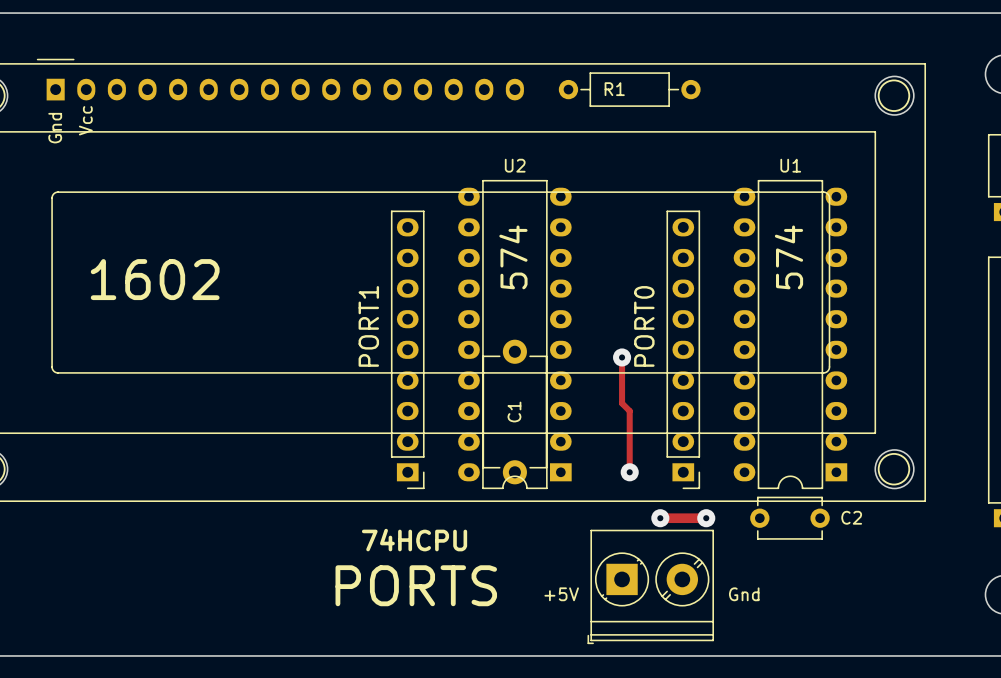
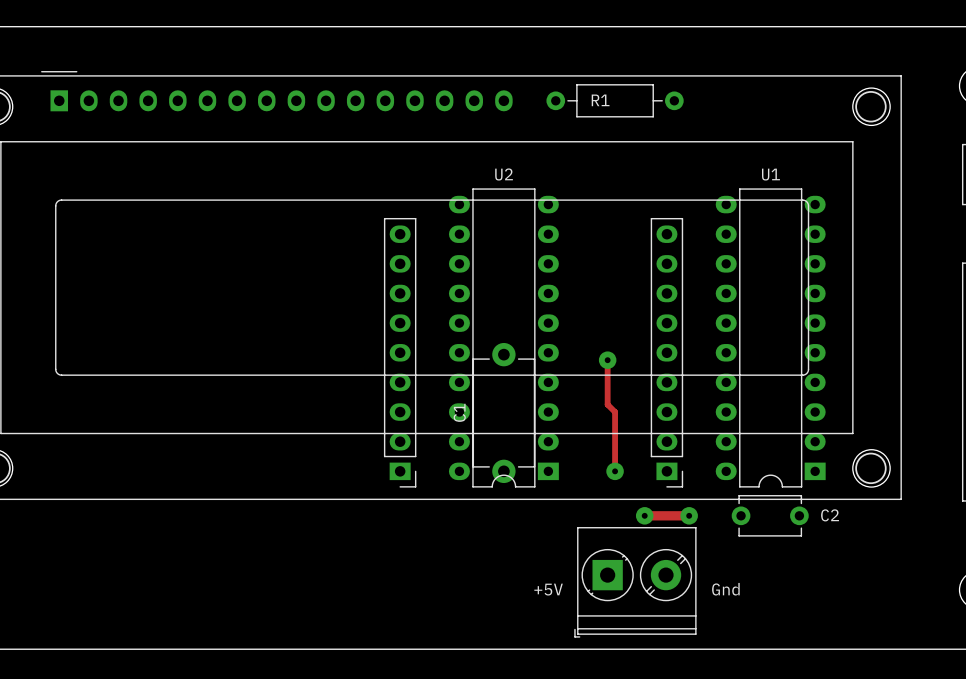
text: Vcc (85, 120) -> none
text: Gnd (55, 128) -> none
text: 574 (513, 257) -> none
text: 574 (788, 257) -> none
text: 1602 (155, 279) -> none
text: PORT1 (368, 326) -> none
text: PORT0 (644, 326) -> none
C1 name position: C1 (514, 412) -> C1 (459, 412)
text: 74HCPU (414, 540) -> none
text: PORTS (416, 585) -> none

